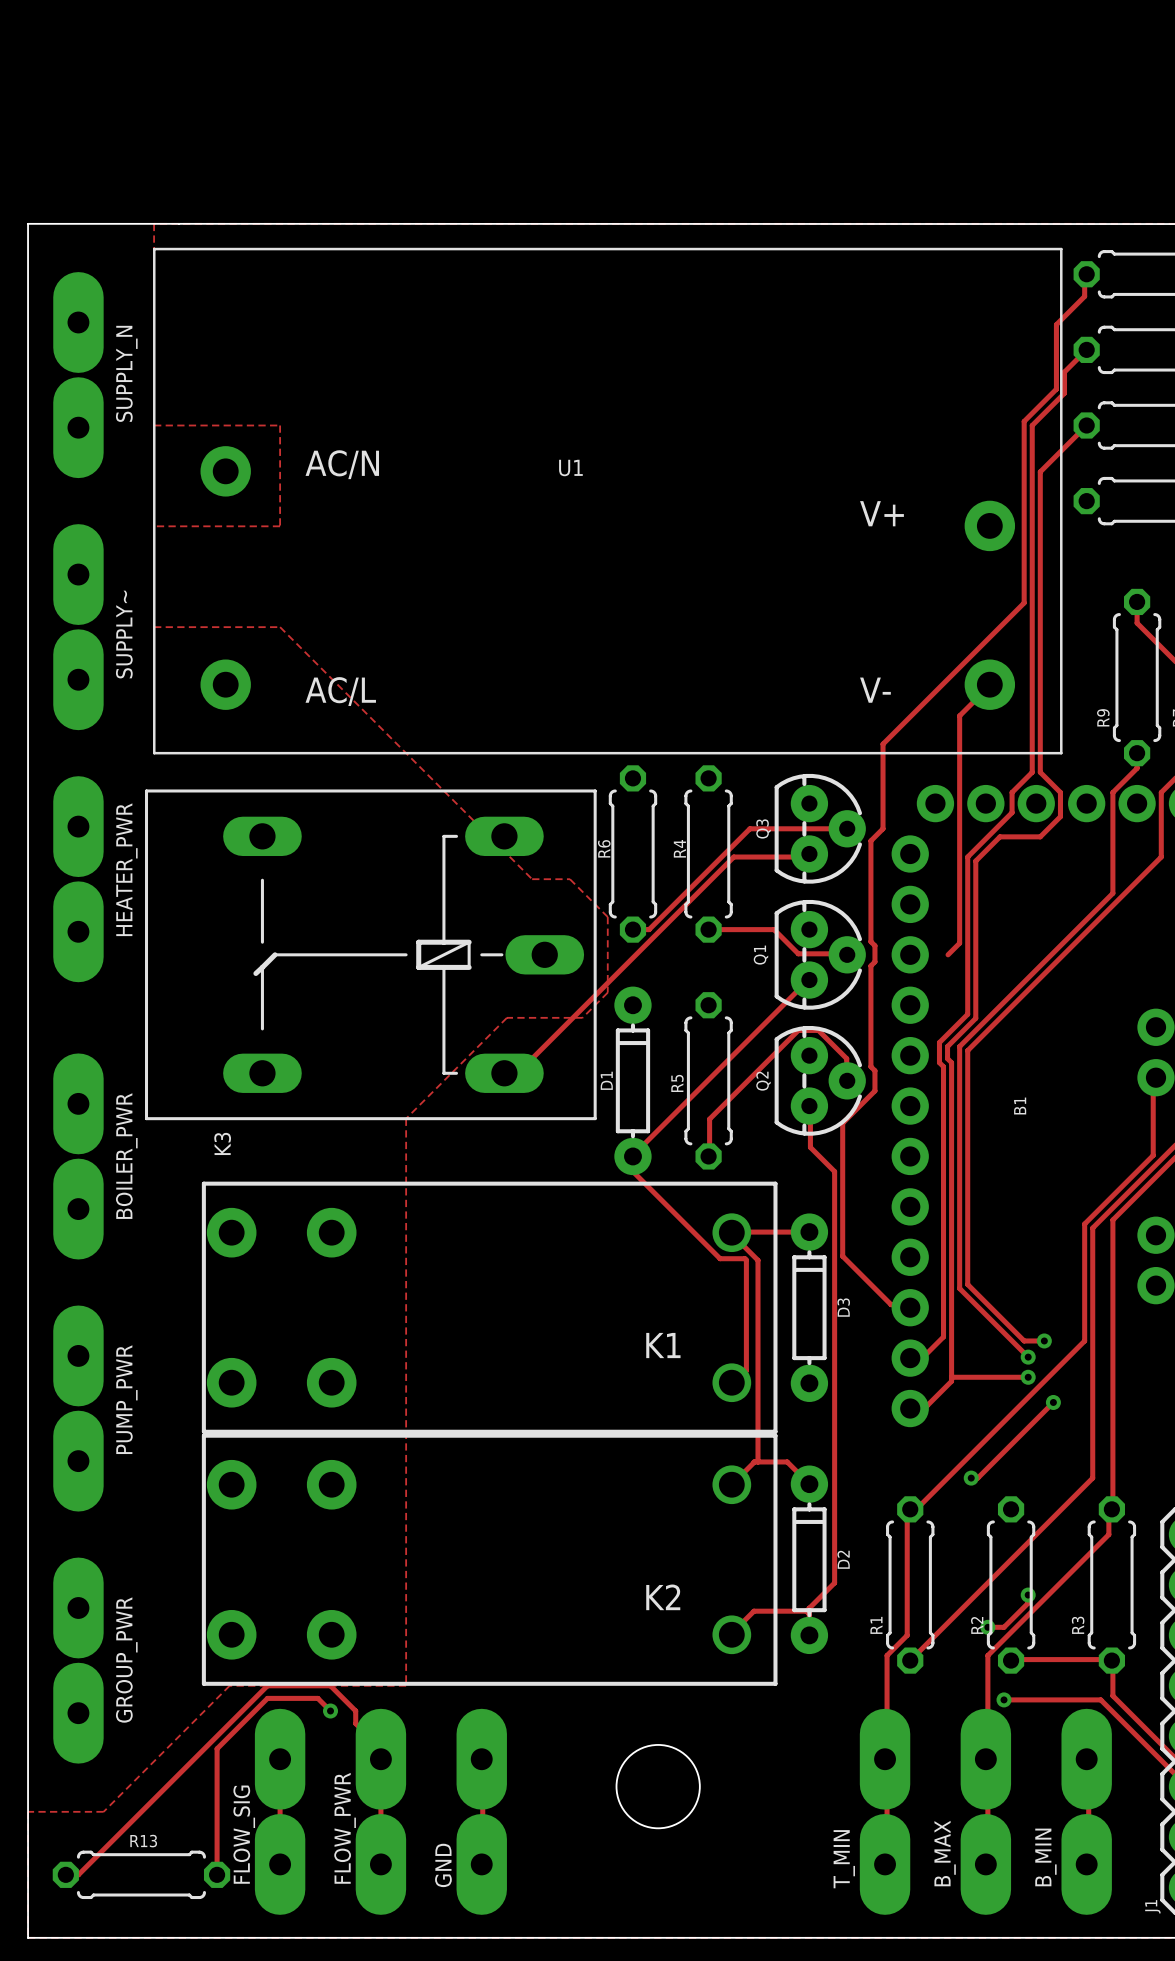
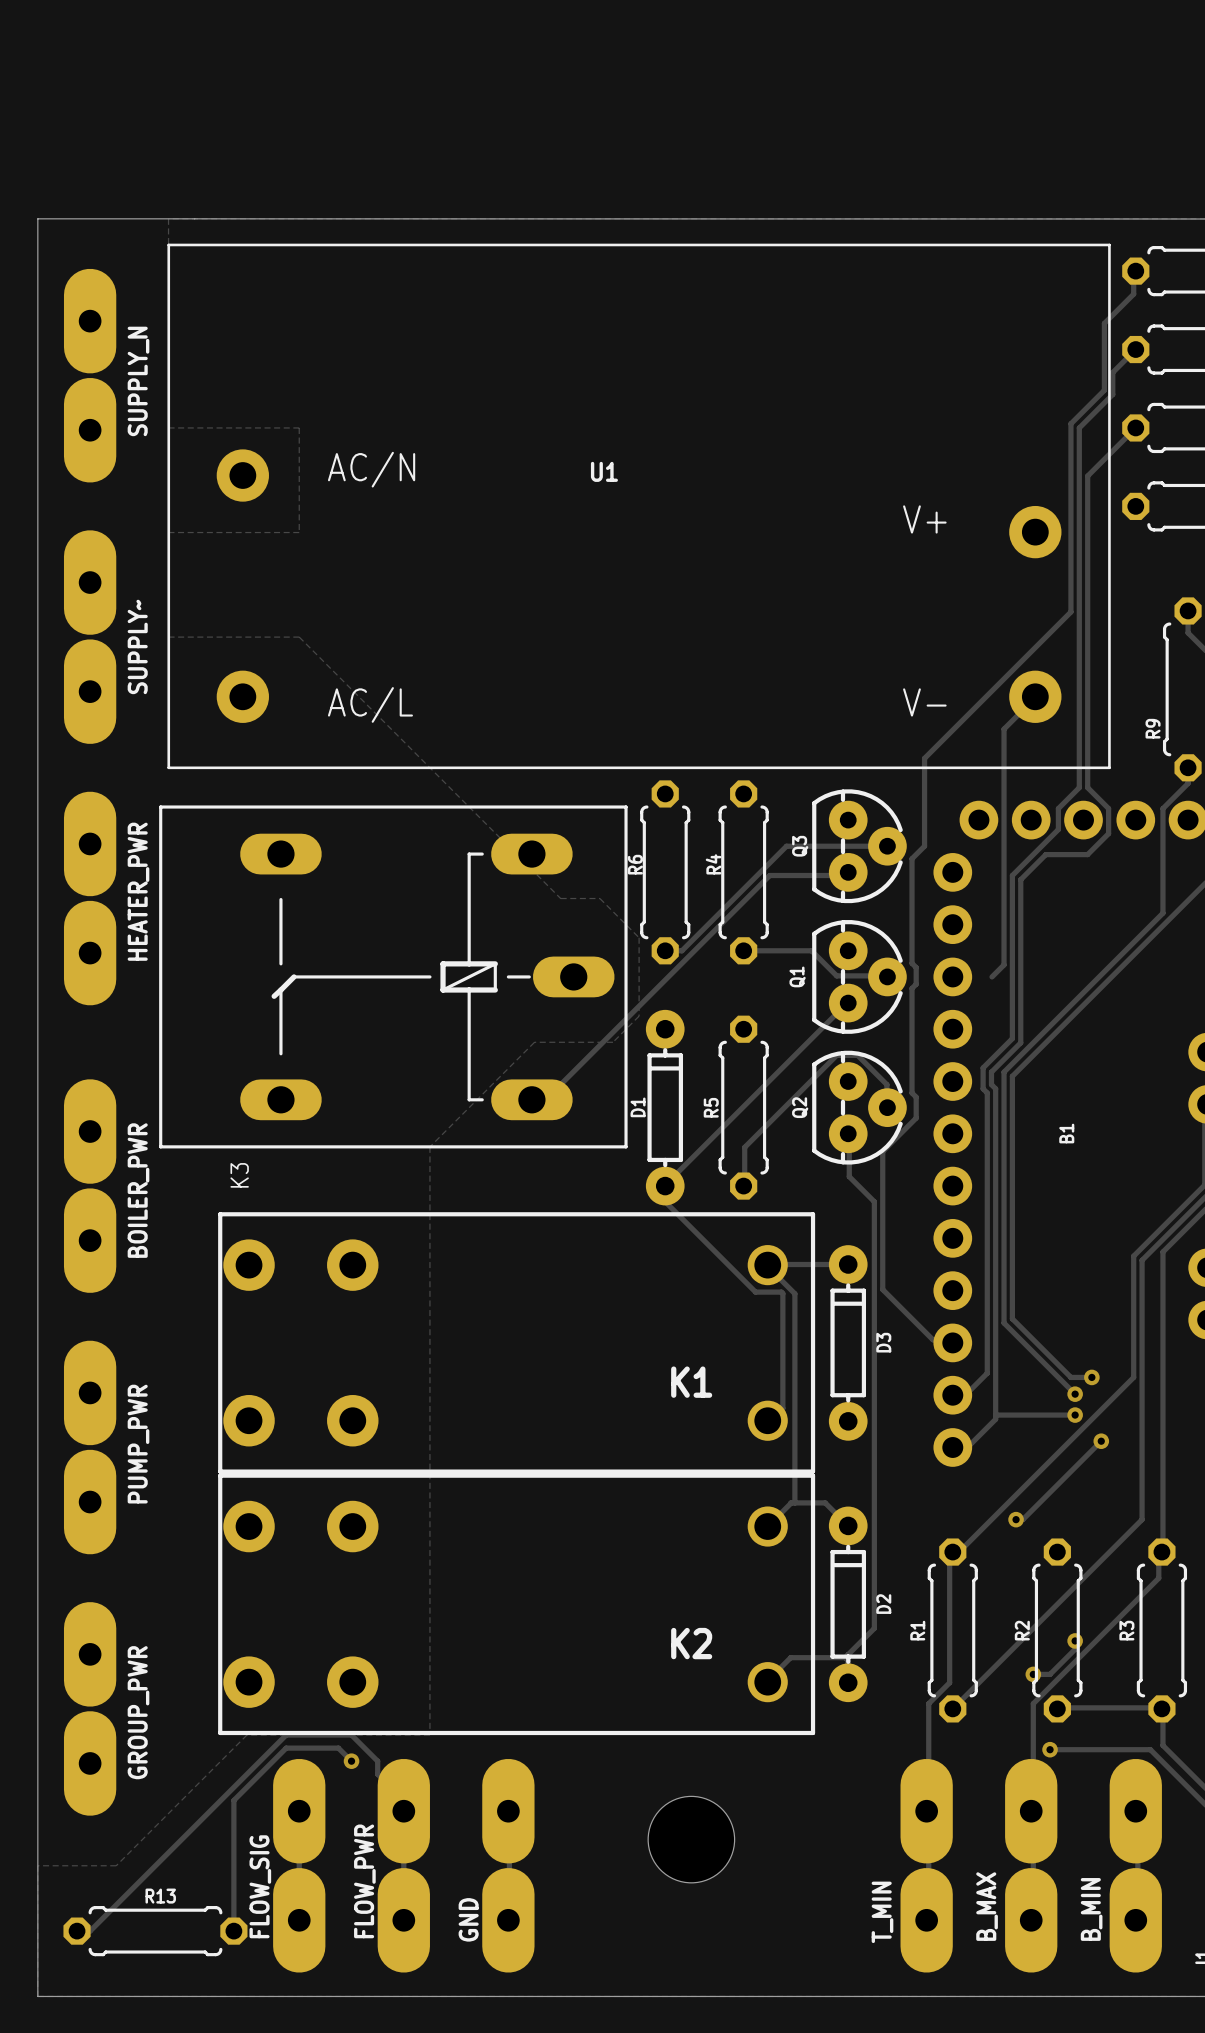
R1 name position: R1 (876, 1625) -> R1 (917, 1630)
R2 name position: R2 (977, 1625) -> R2 (1022, 1630)
R3 name position: R3 (1078, 1625) -> R3 (1126, 1630)

